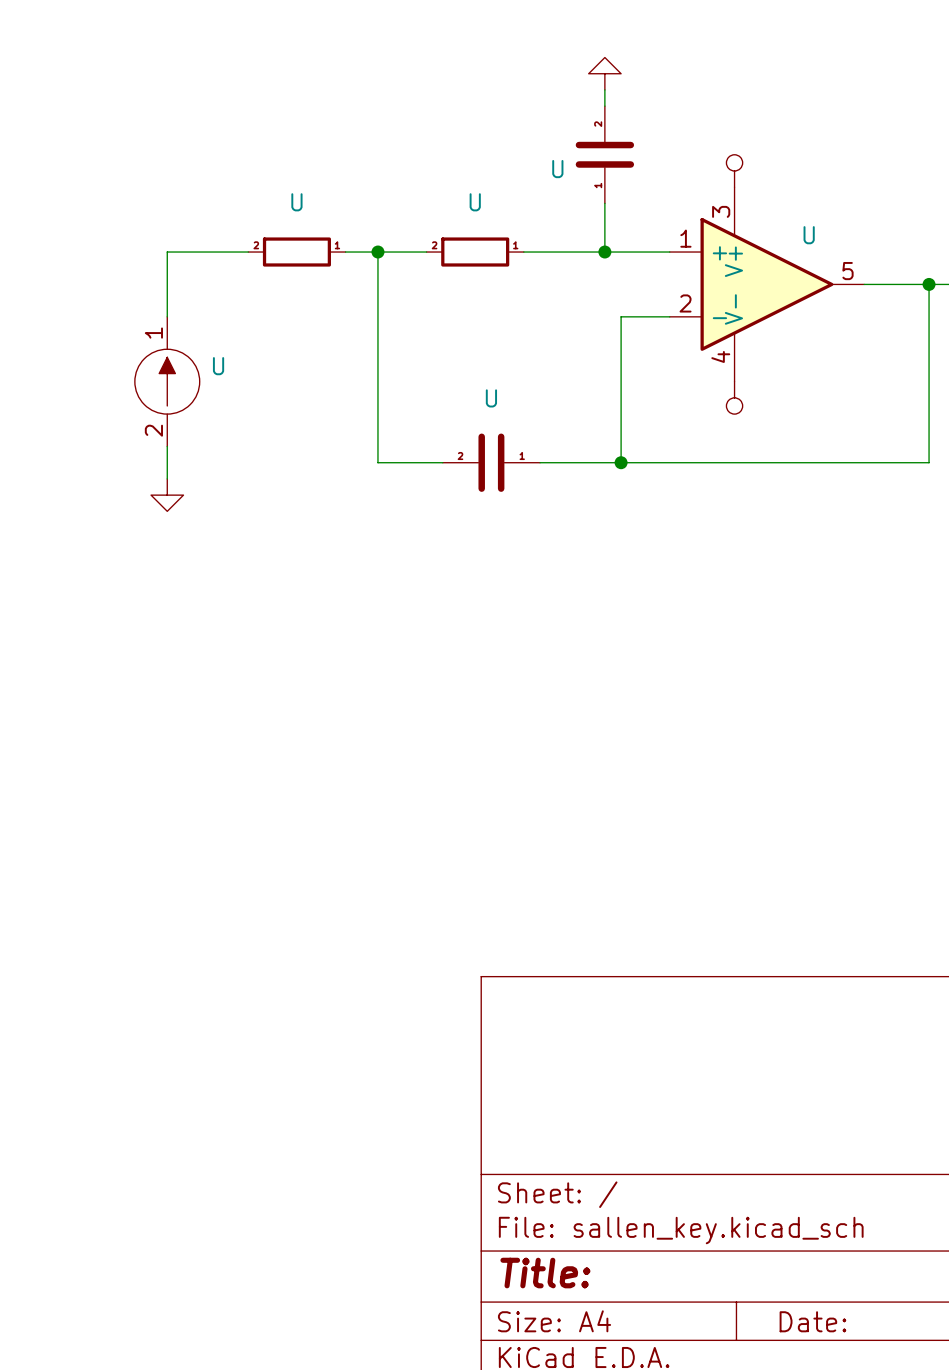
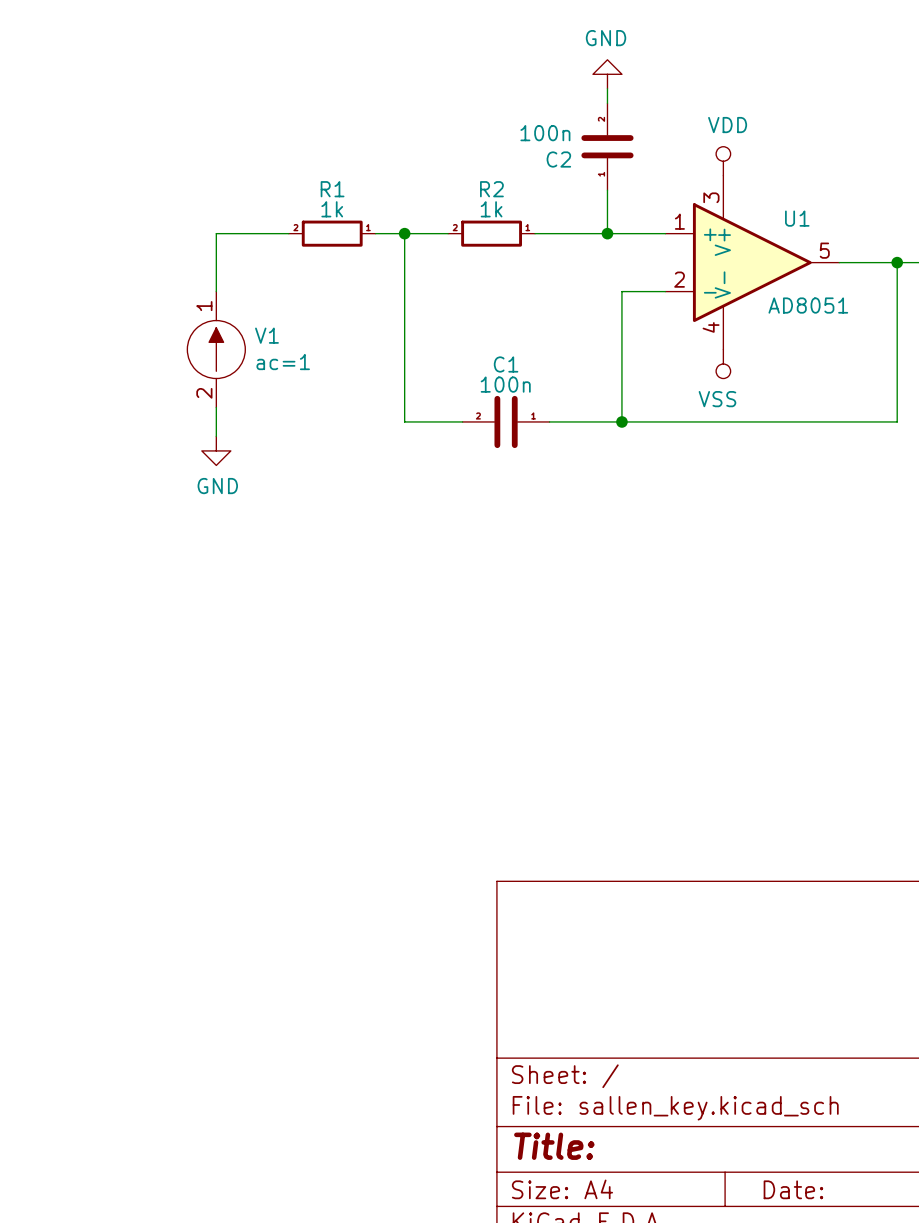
power symbol text: none -> GND (606, 38)
power symbol text: none -> VDD (727, 125)
U value: none -> 100n (545, 133)
U name: U (557, 169) -> C2 (558, 159)
U name: U (296, 202) -> R1 (332, 189)
U name: U (475, 202) -> R2 (491, 189)
U value: none -> 1k (332, 209)
U value: none -> 1k (491, 209)
U name: U (809, 235) -> U1 (797, 218)
U value: none -> AD8051 (808, 305)
U name: U (218, 366) -> V1 (266, 335)
U value: none -> ac=1 (283, 362)
U name: U (491, 398) -> C1 (506, 364)
U value: none -> 100n (505, 384)
power symbol text: none -> VSS (717, 399)
power symbol text: none -> GND (217, 486)

